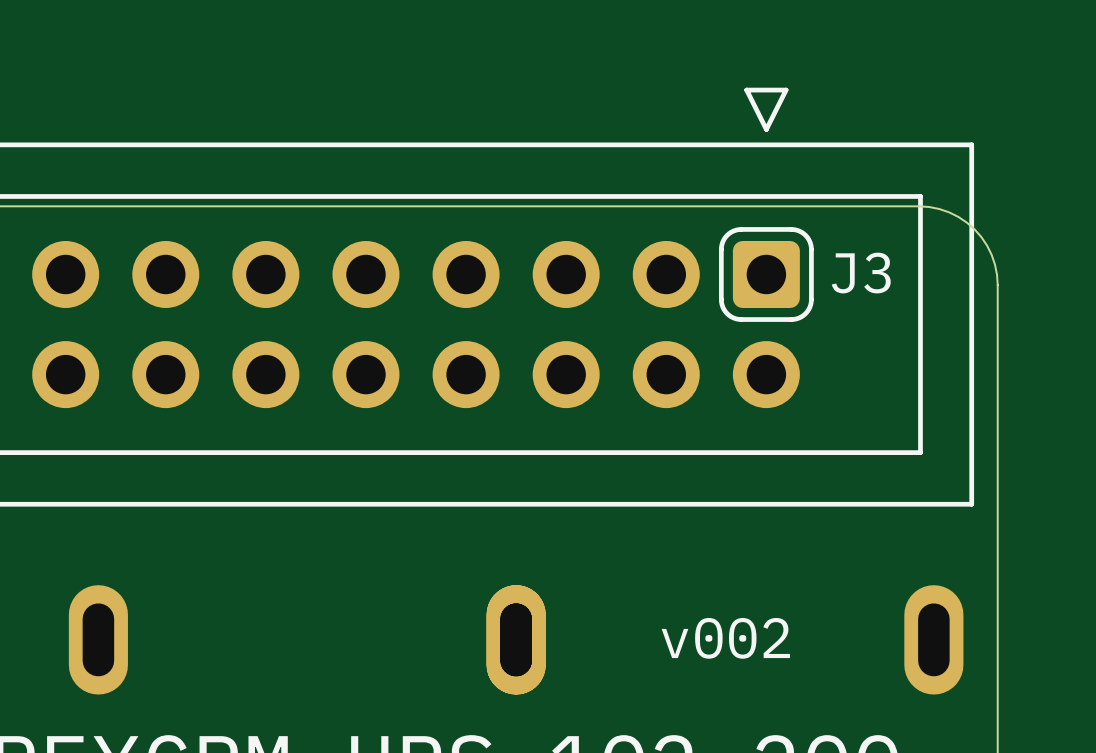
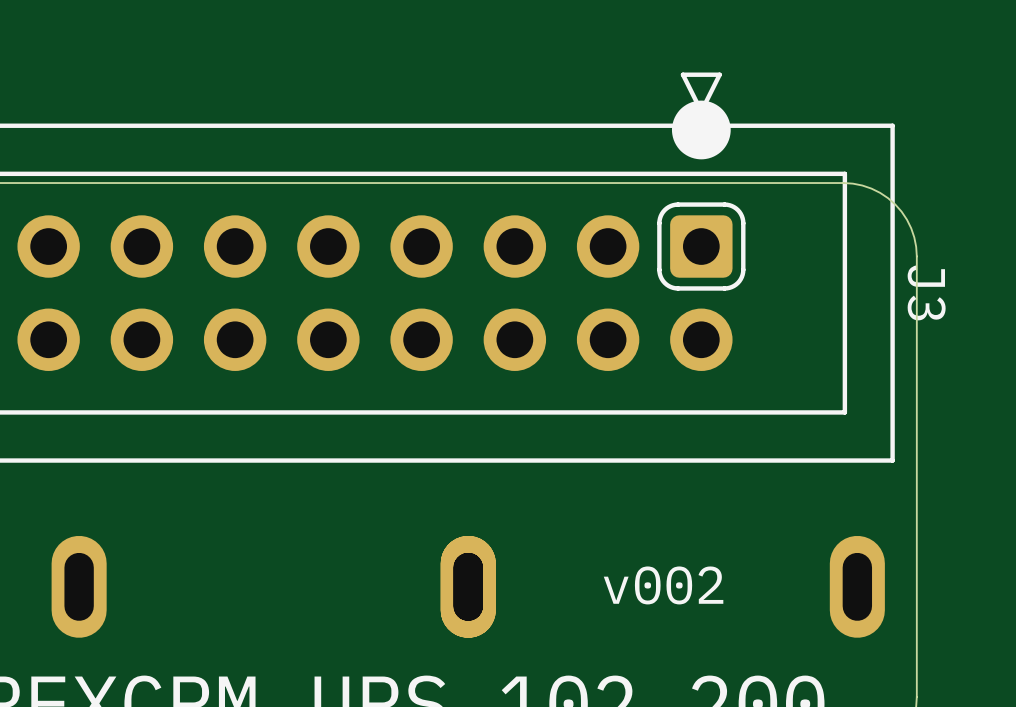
drawing: none -> [671, 100, 731, 160]
J3 name rotation: 0° (861, 273) -> 90° clockwise (926, 292)
J3 name position: J3 (861, 273) -> J3 (926, 292)

